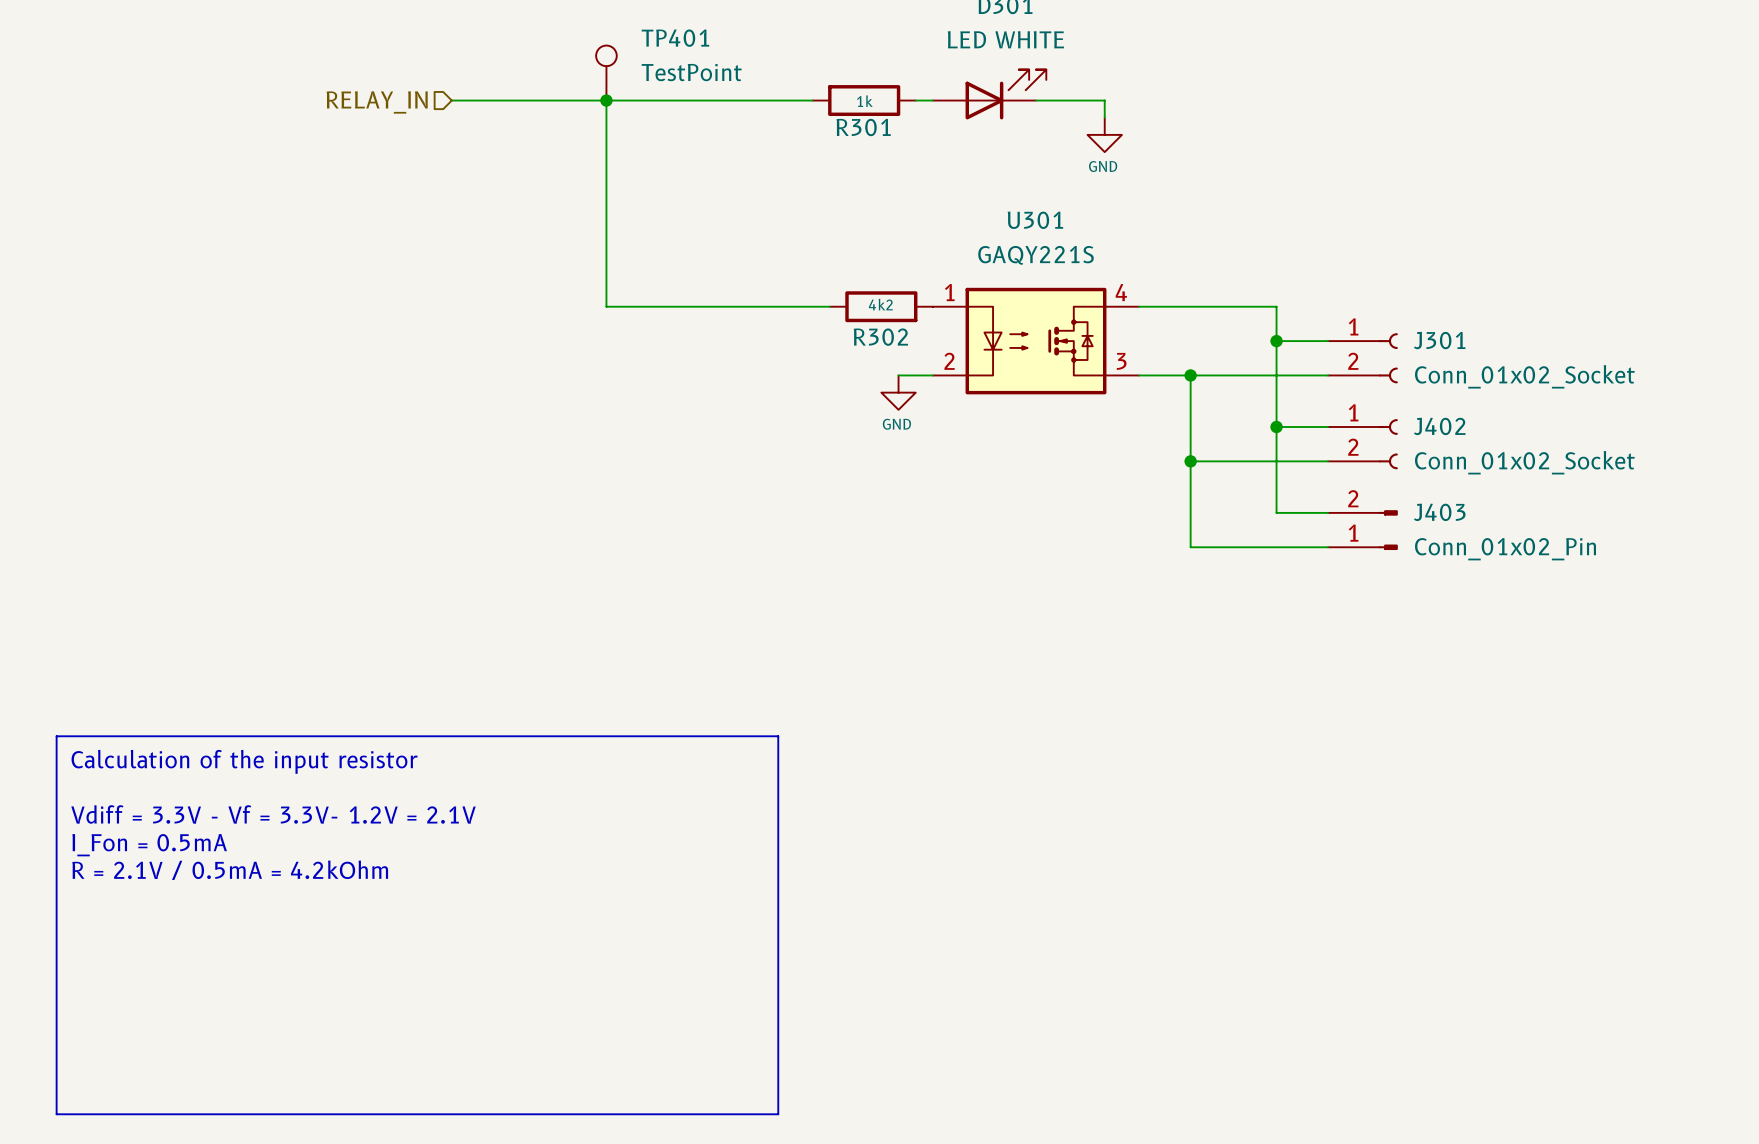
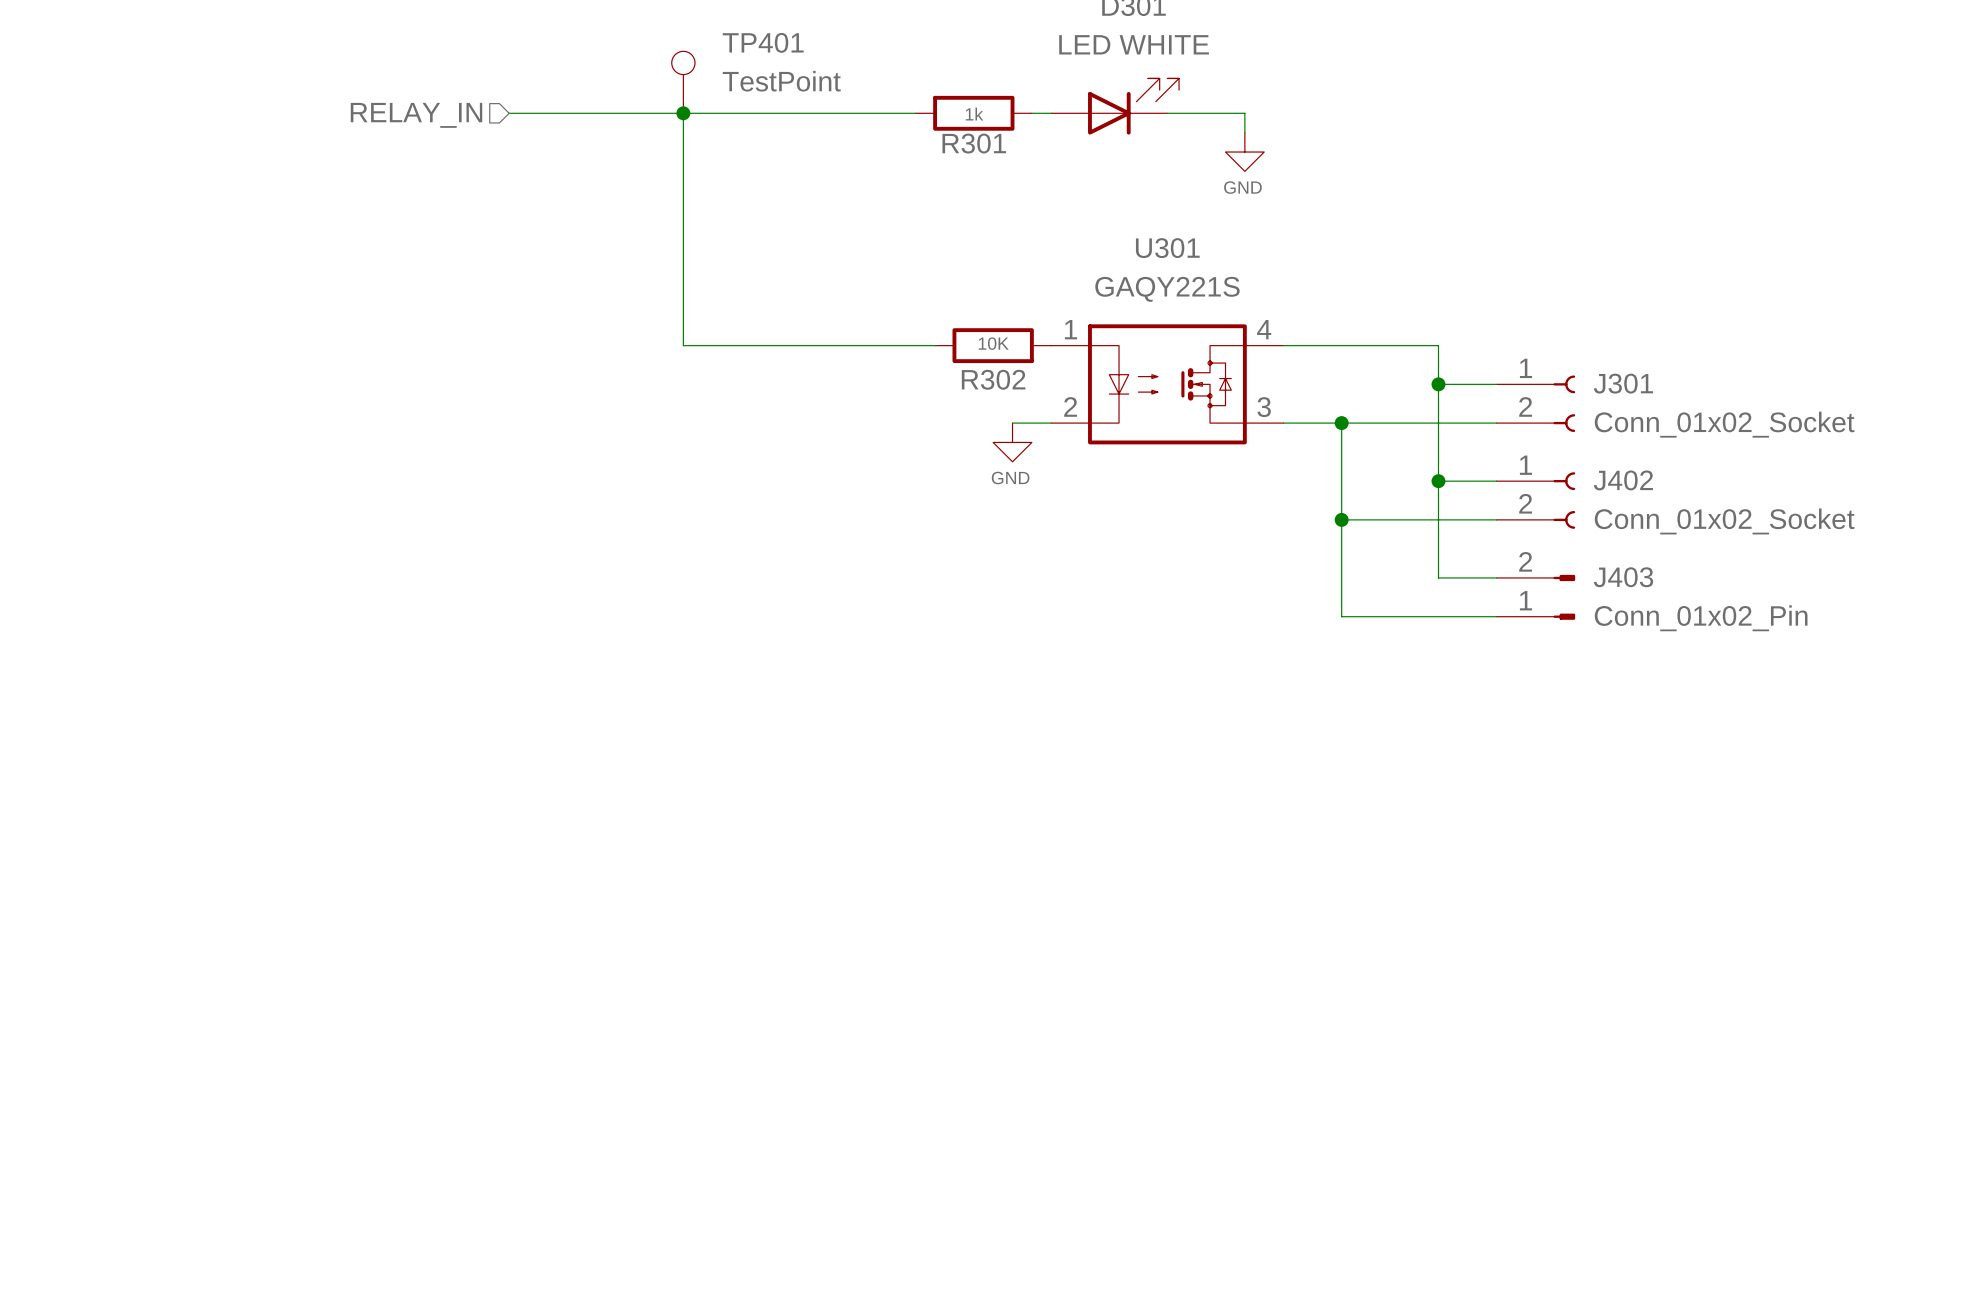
R302 value: 4k2 (880, 304) -> 10K (993, 343)
line: (56, 736) (778, 736) (778, 1114) (56, 1114) (56, 736) -> none
text: Calculation of the input resistor (244, 761) -> none
text: Vdiff = 3.3V - Vf = 3.3V- 1.2V = 2.1V (273, 814) -> none
text: I_Fon = 0.5mA (149, 845) -> none
text: R = 2.1V / 0.5mA = 4.2kOhm (230, 870) -> none

